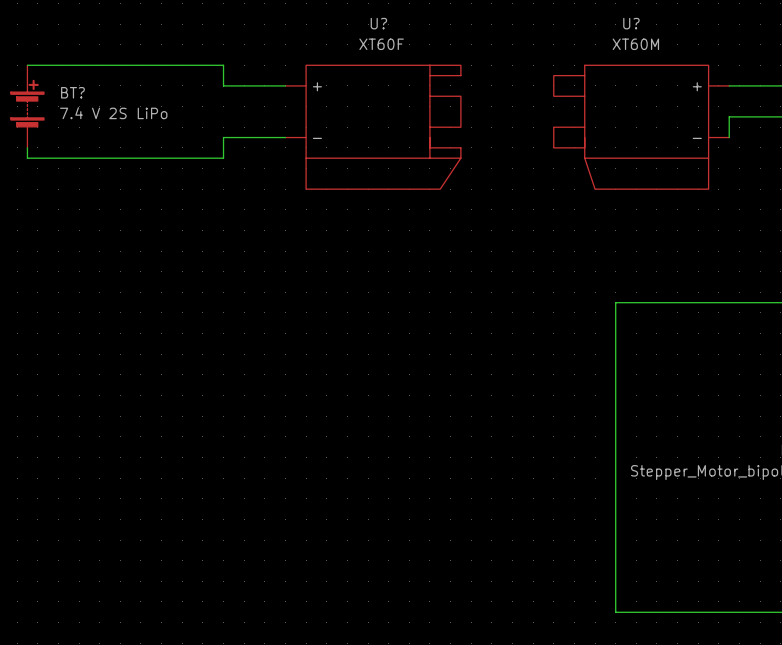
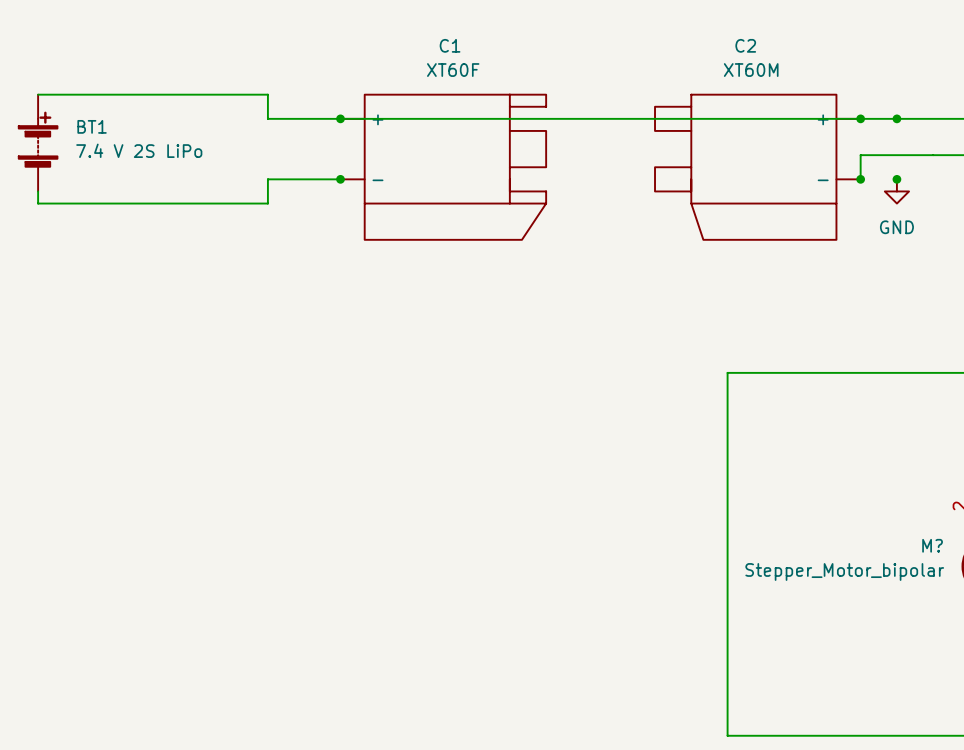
U? name: U? (378, 23) -> C1 (450, 45)
U? name: U? (631, 23) -> C2 (745, 45)
wire: none -> (340, 118) (860, 118)
junction: none -> (340, 118)
junction: none -> (860, 118)
junction: none -> (896, 118)
BT? name: BT? (72, 92) -> BT1 (92, 126)
junction: none -> (340, 179)
junction: none -> (860, 179)
junction: none -> (896, 179)
power symbol: none -> GND (896, 191)

